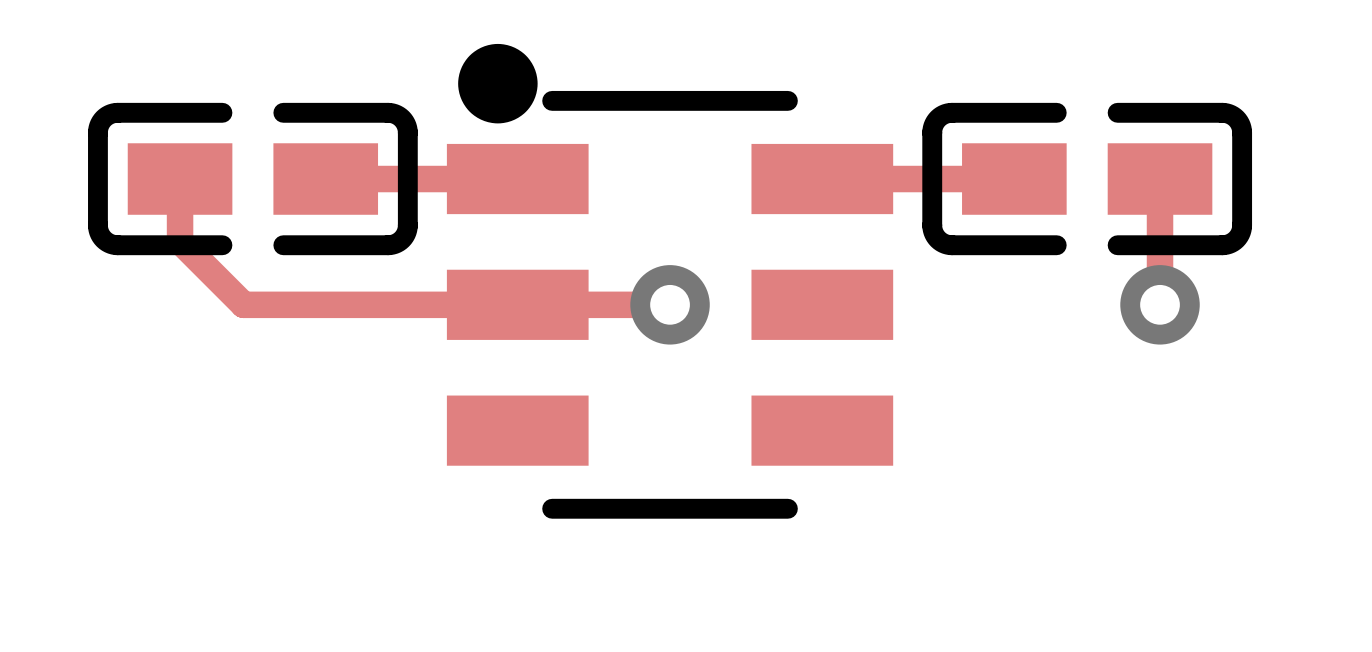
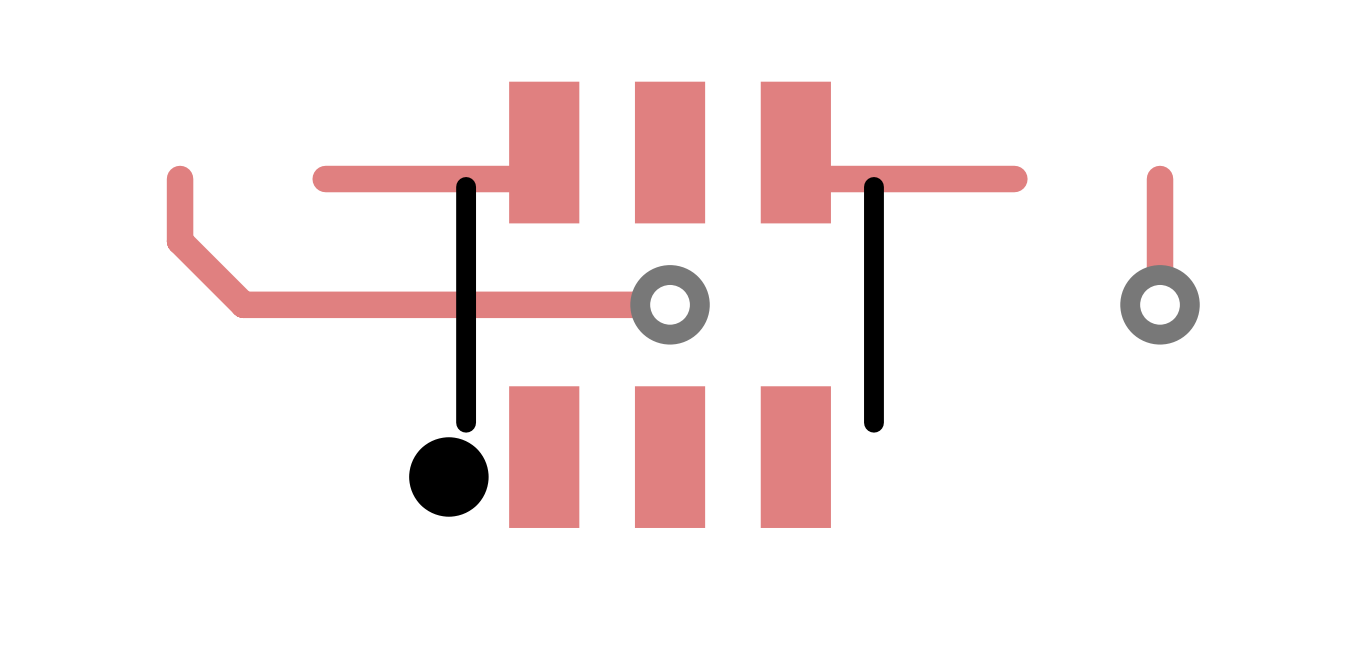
part: (252, 179) -> none
part: (1087, 179) -> none
part rotation: 0° (670, 281) -> 90° counterclockwise (646, 304)

